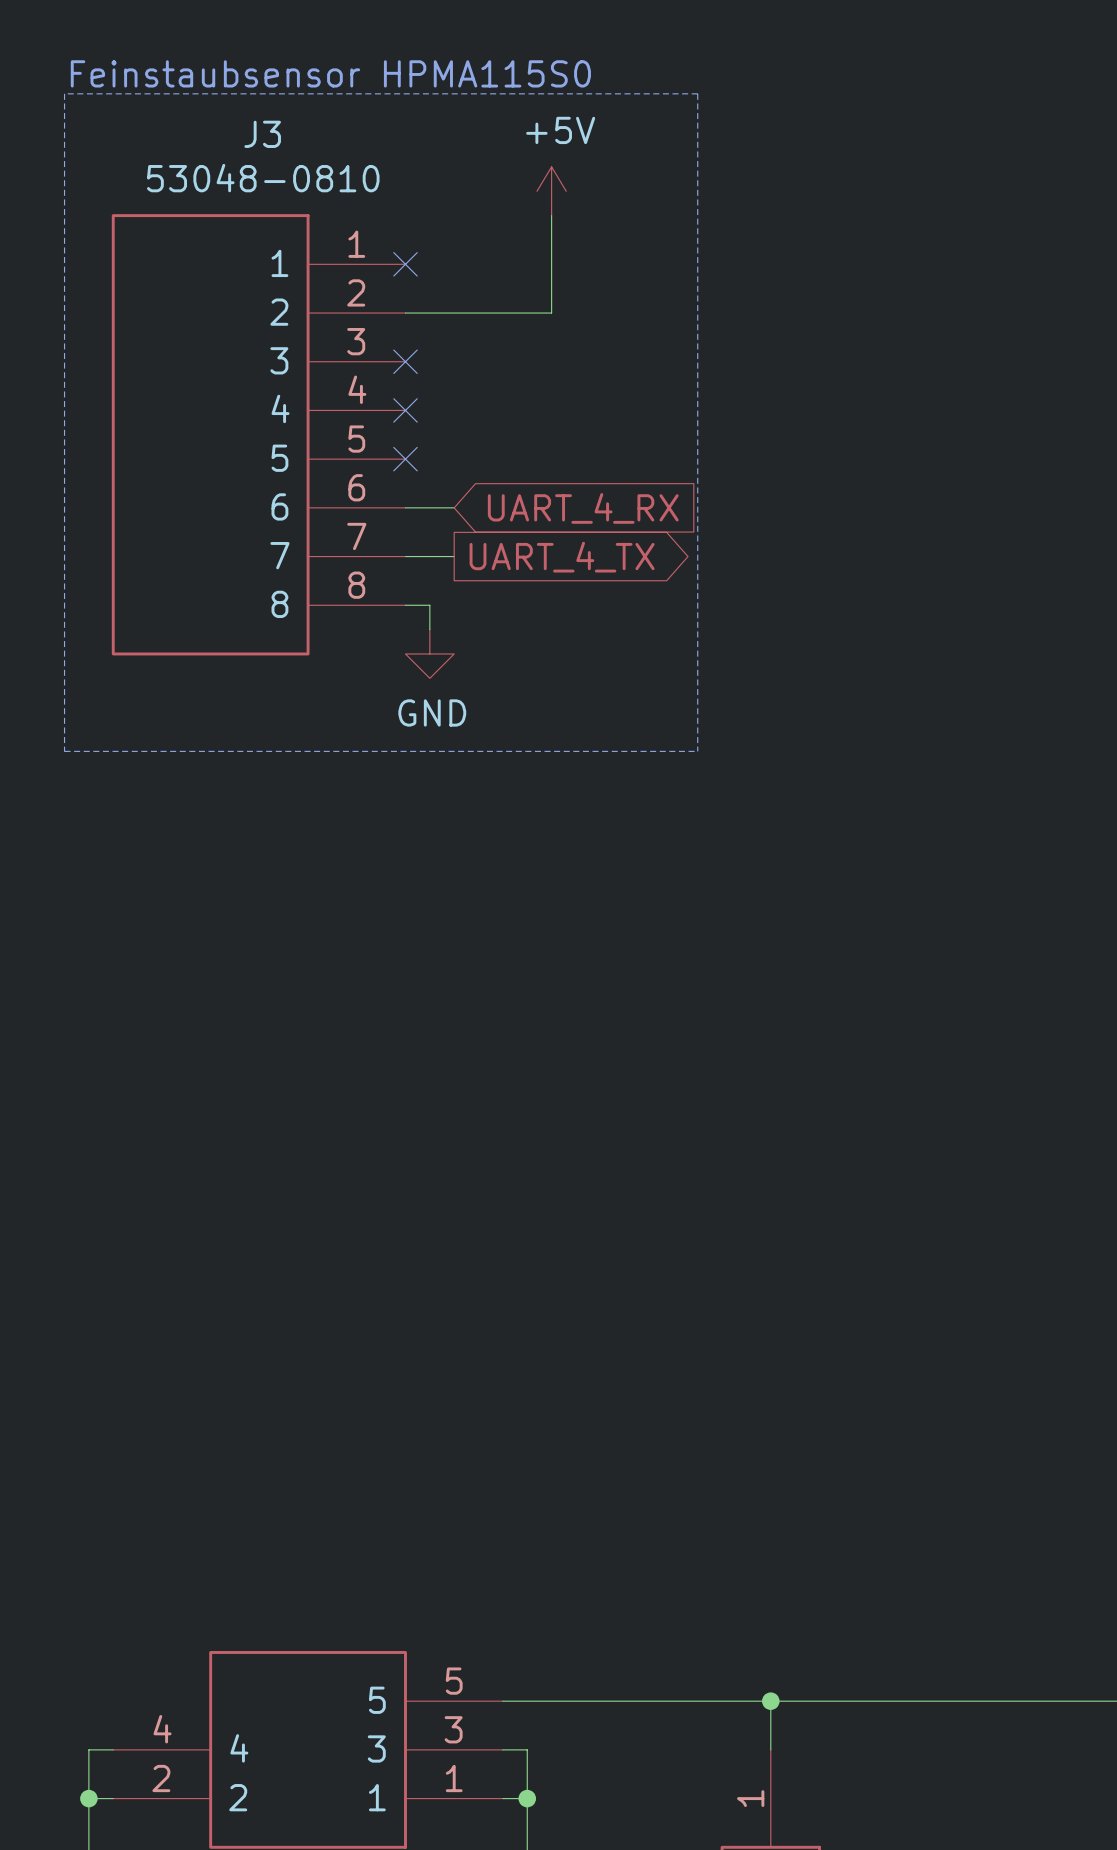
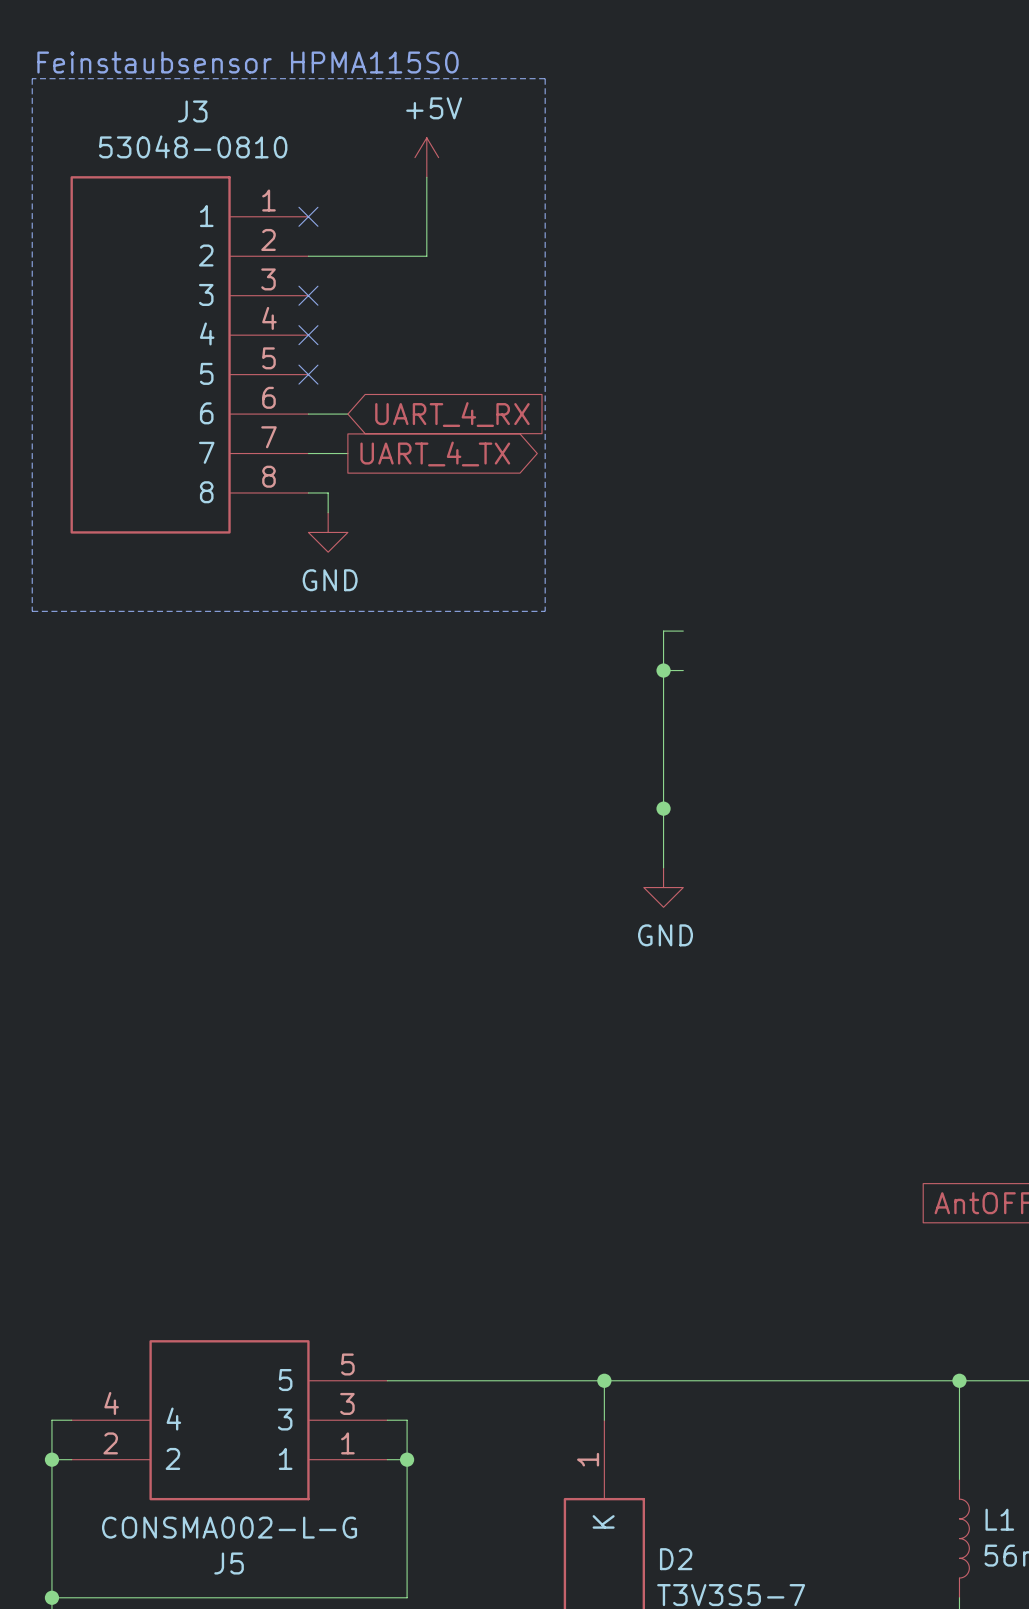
wire: none -> (683, 631) (663, 631) (663, 867)
wire: none -> (663, 670) (683, 670)
junction: none -> (663, 670)
junction: none -> (663, 808)
power symbol: none -> GND (663, 887)

